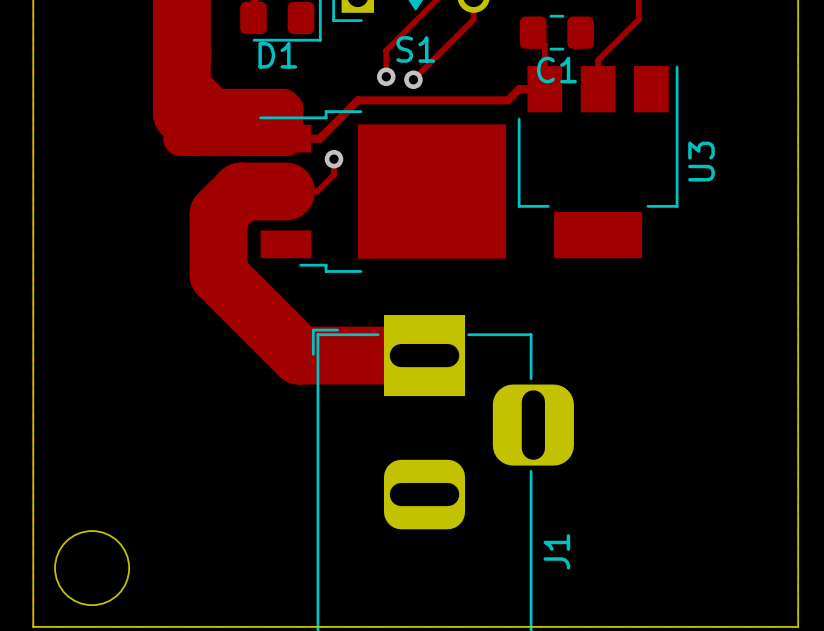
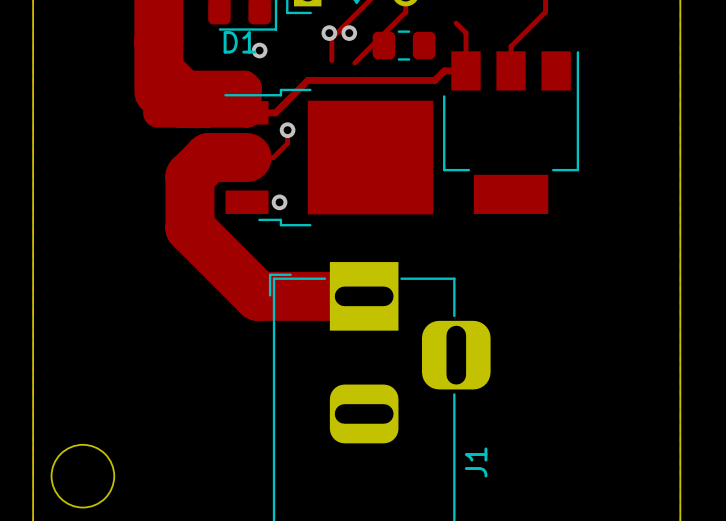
C1: (556, 32) -> none
via: none -> (329, 33)
via: none -> (349, 33)
S1 name: S1 (415, 49) -> none
part: none -> (404, 45)
via: none -> (259, 50)
via: (386, 76) -> none
via: (413, 79) -> none
U3 name: U3 (701, 161) -> none
via: none -> (279, 202)

